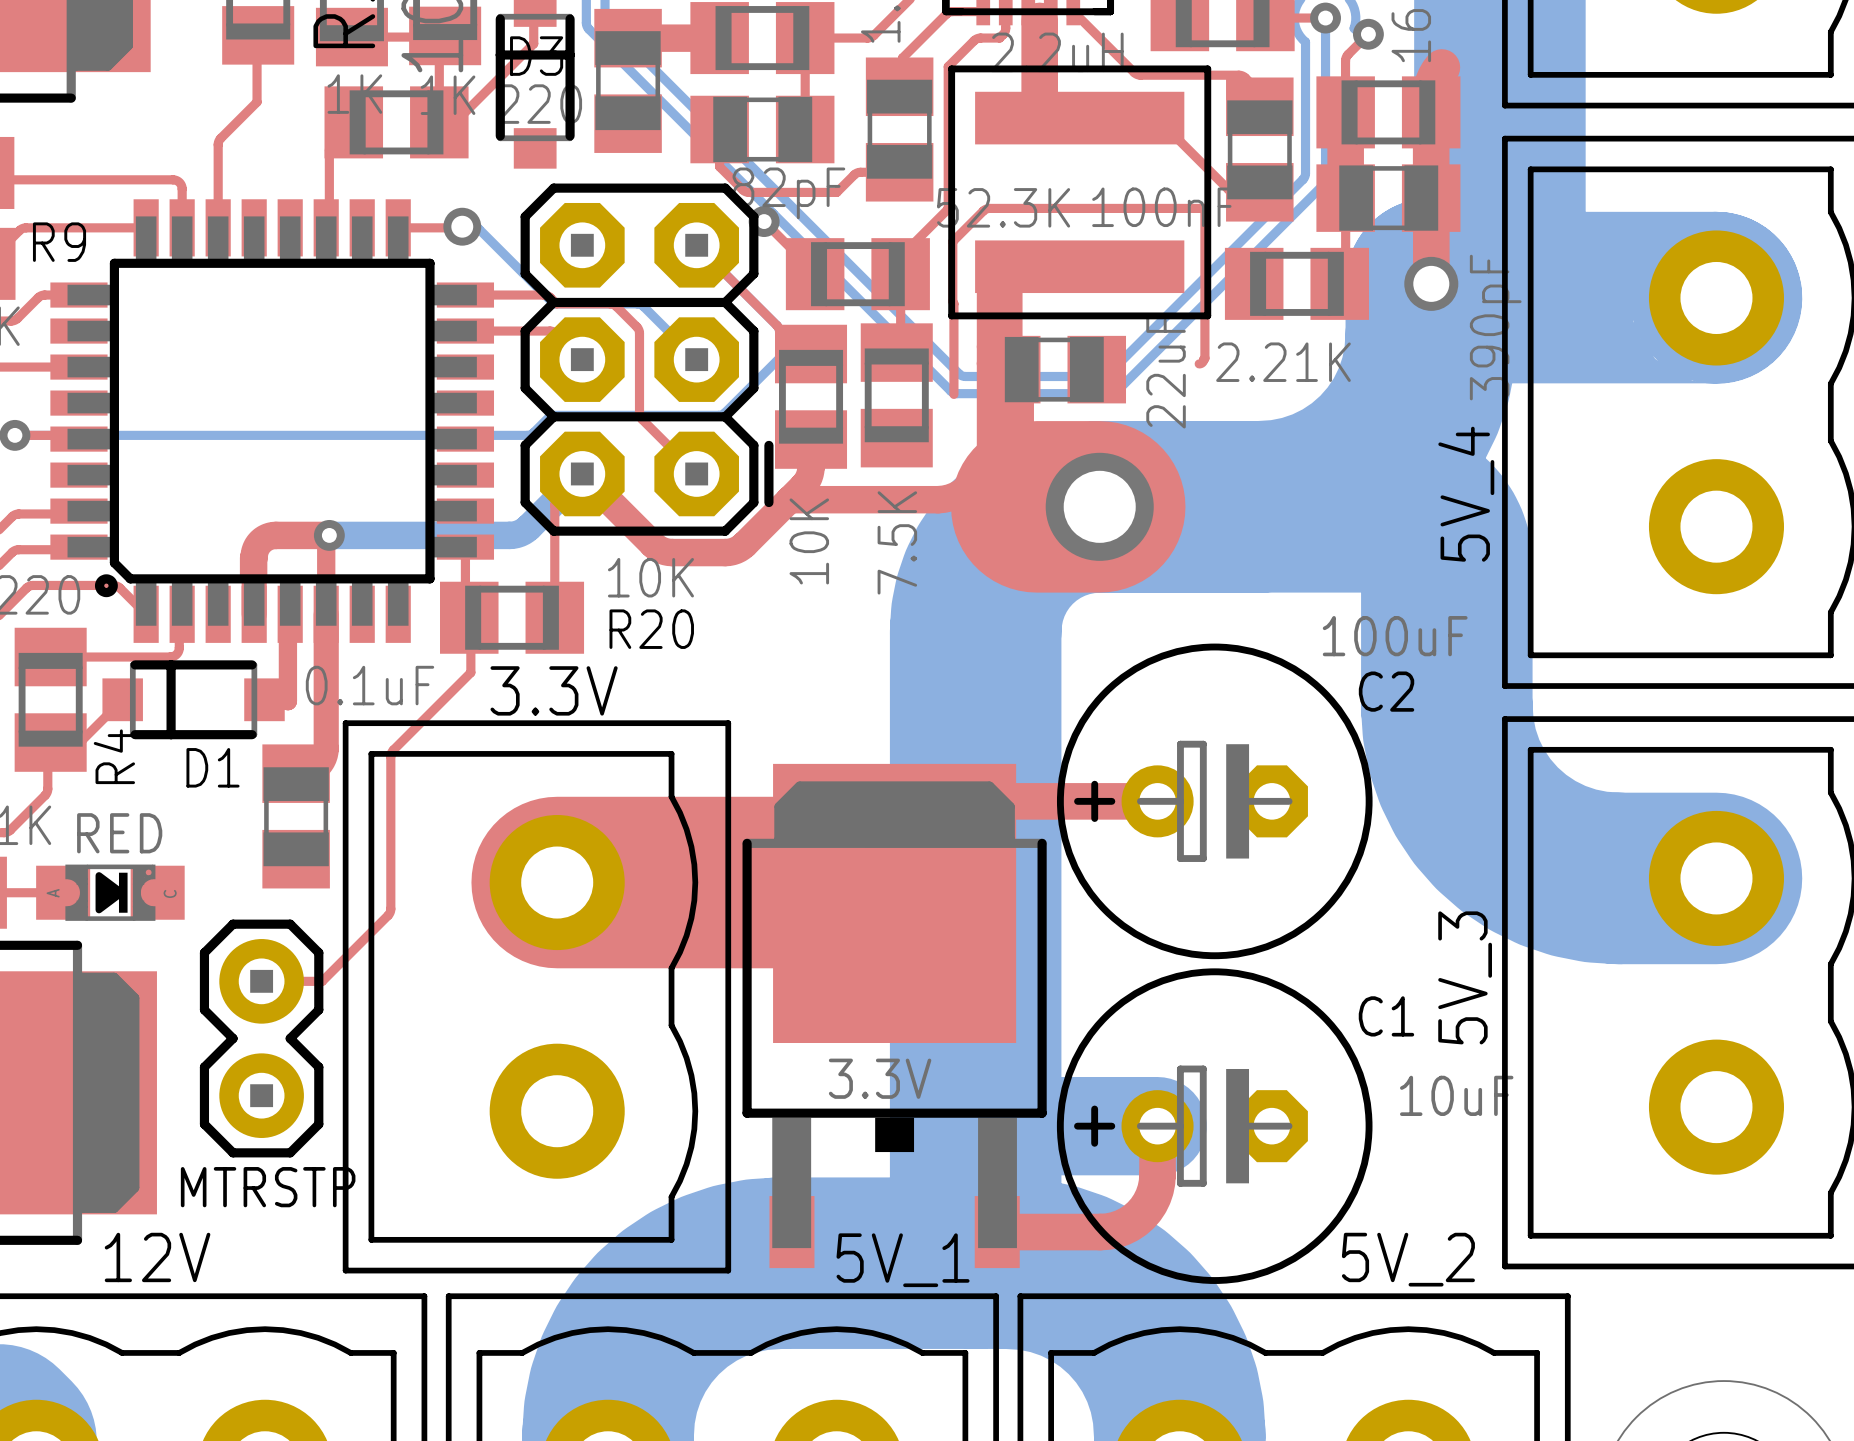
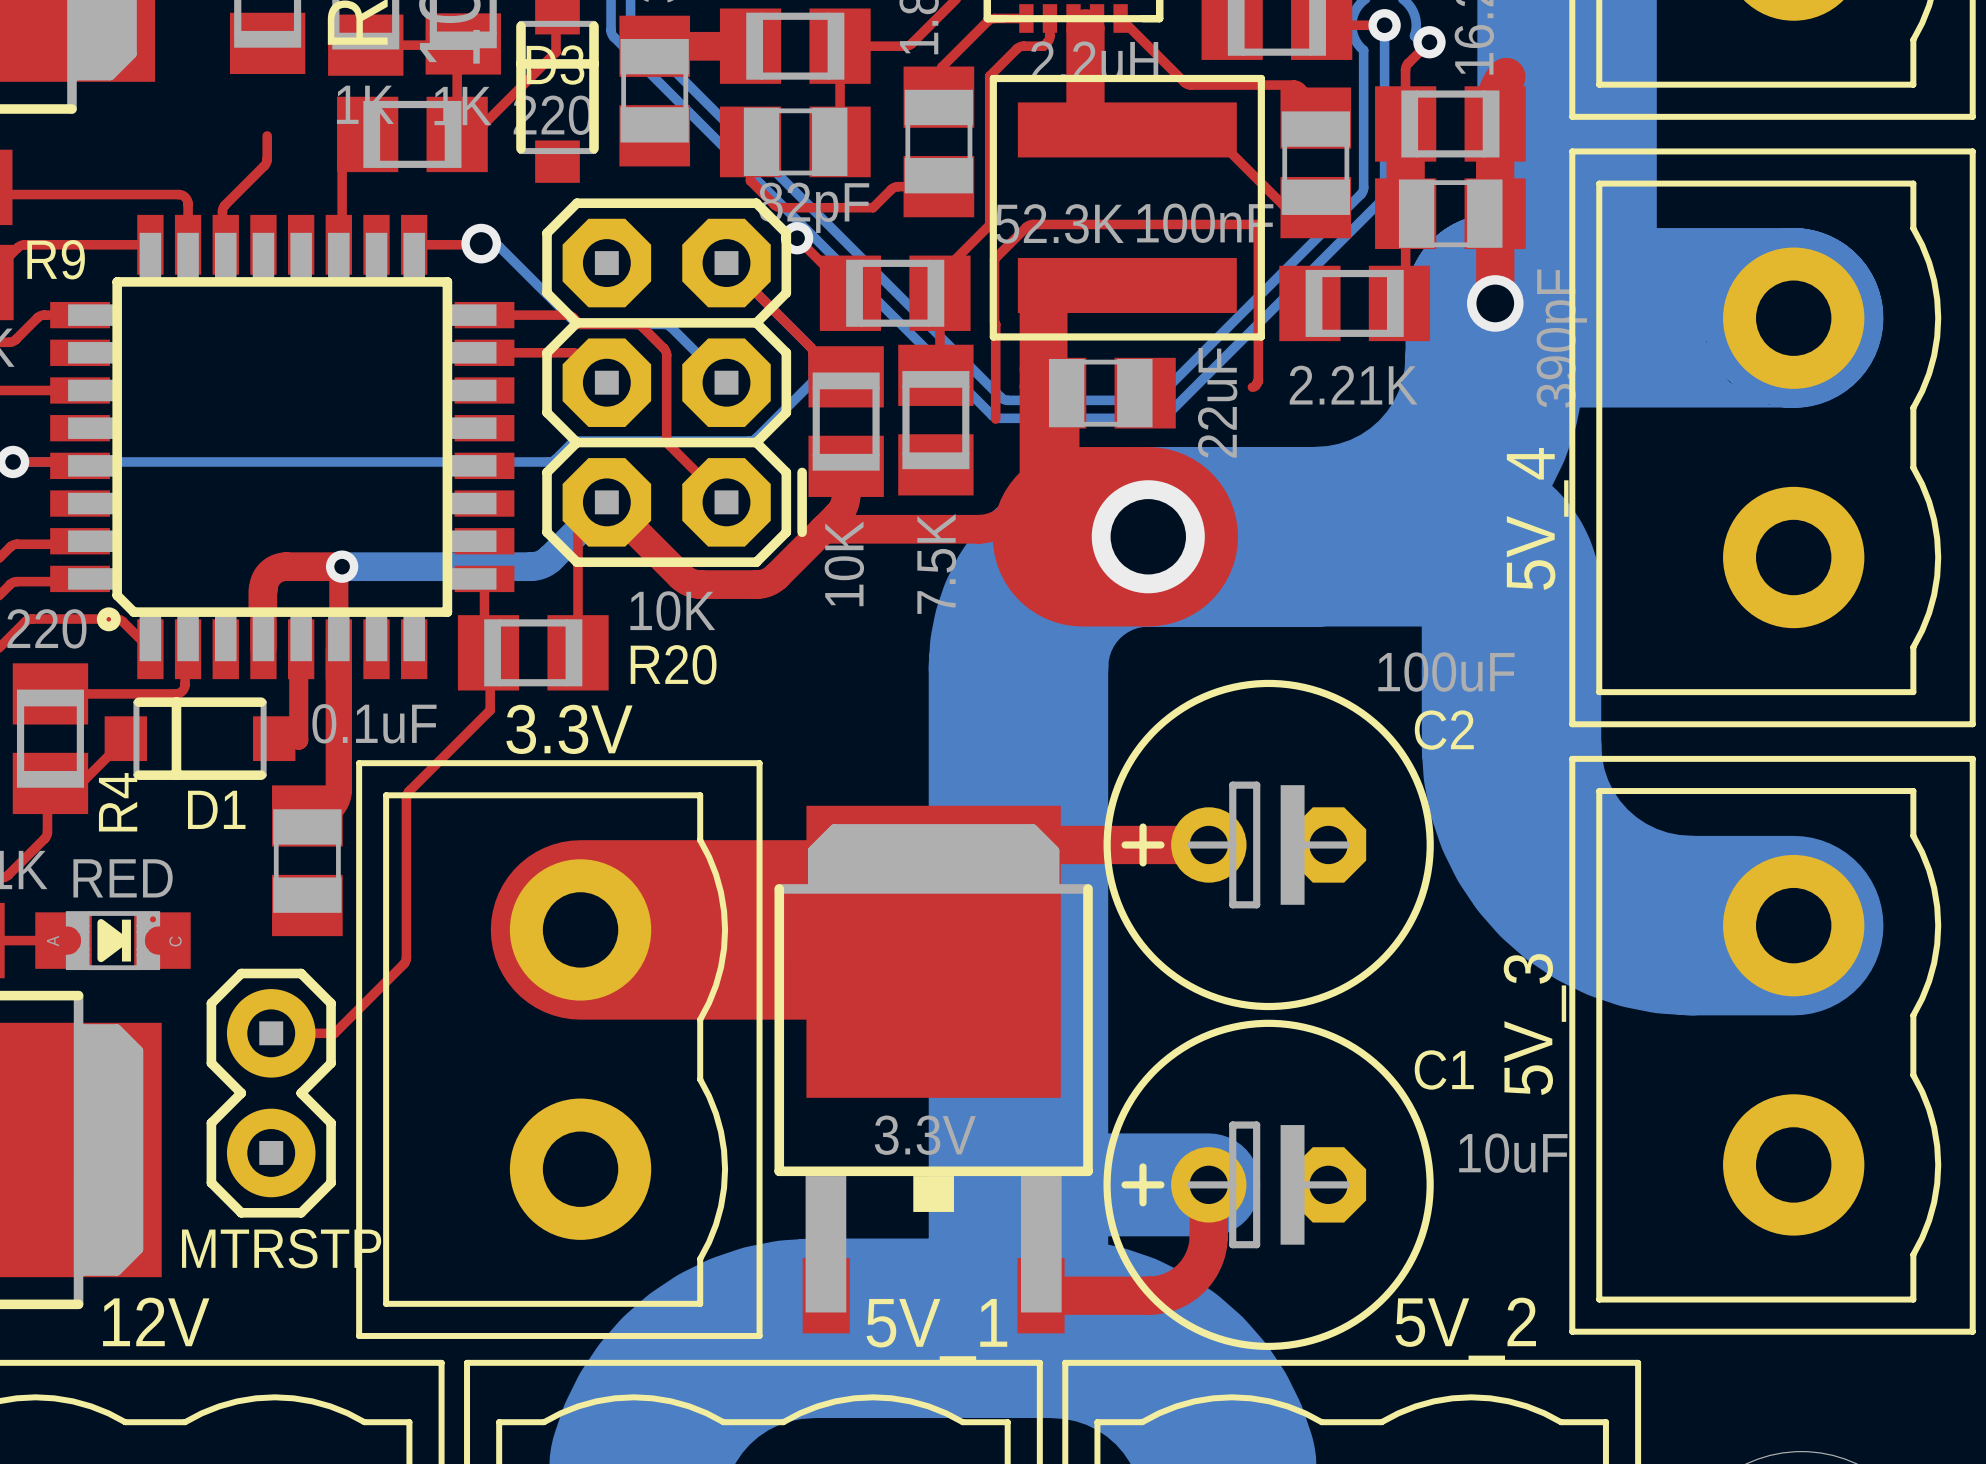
top track: (258, 35) (257, 102) (218, 142) (218, 227) -> (267, 135) (265, 163) (223, 208) (222, 241) (225, 244)

